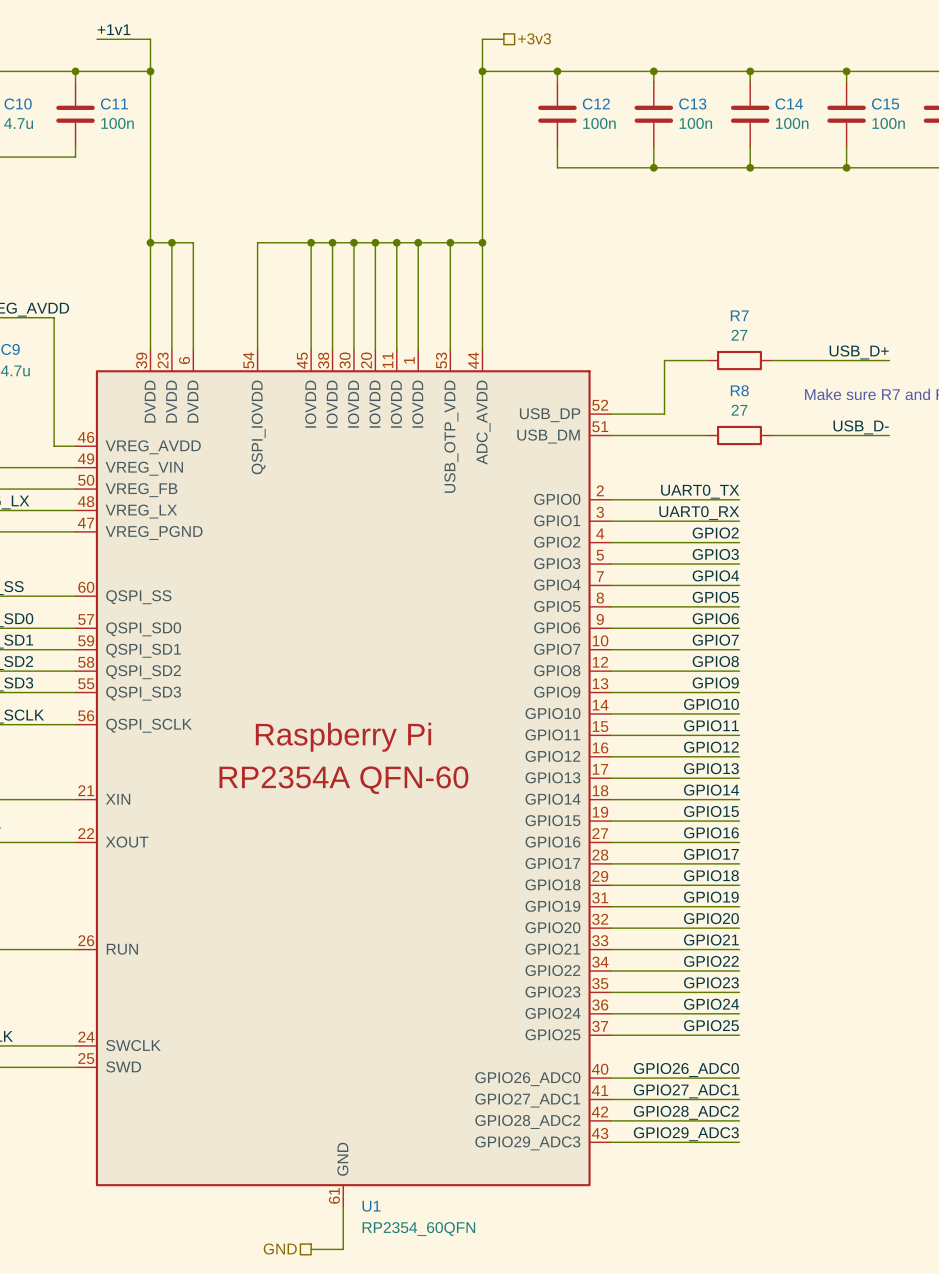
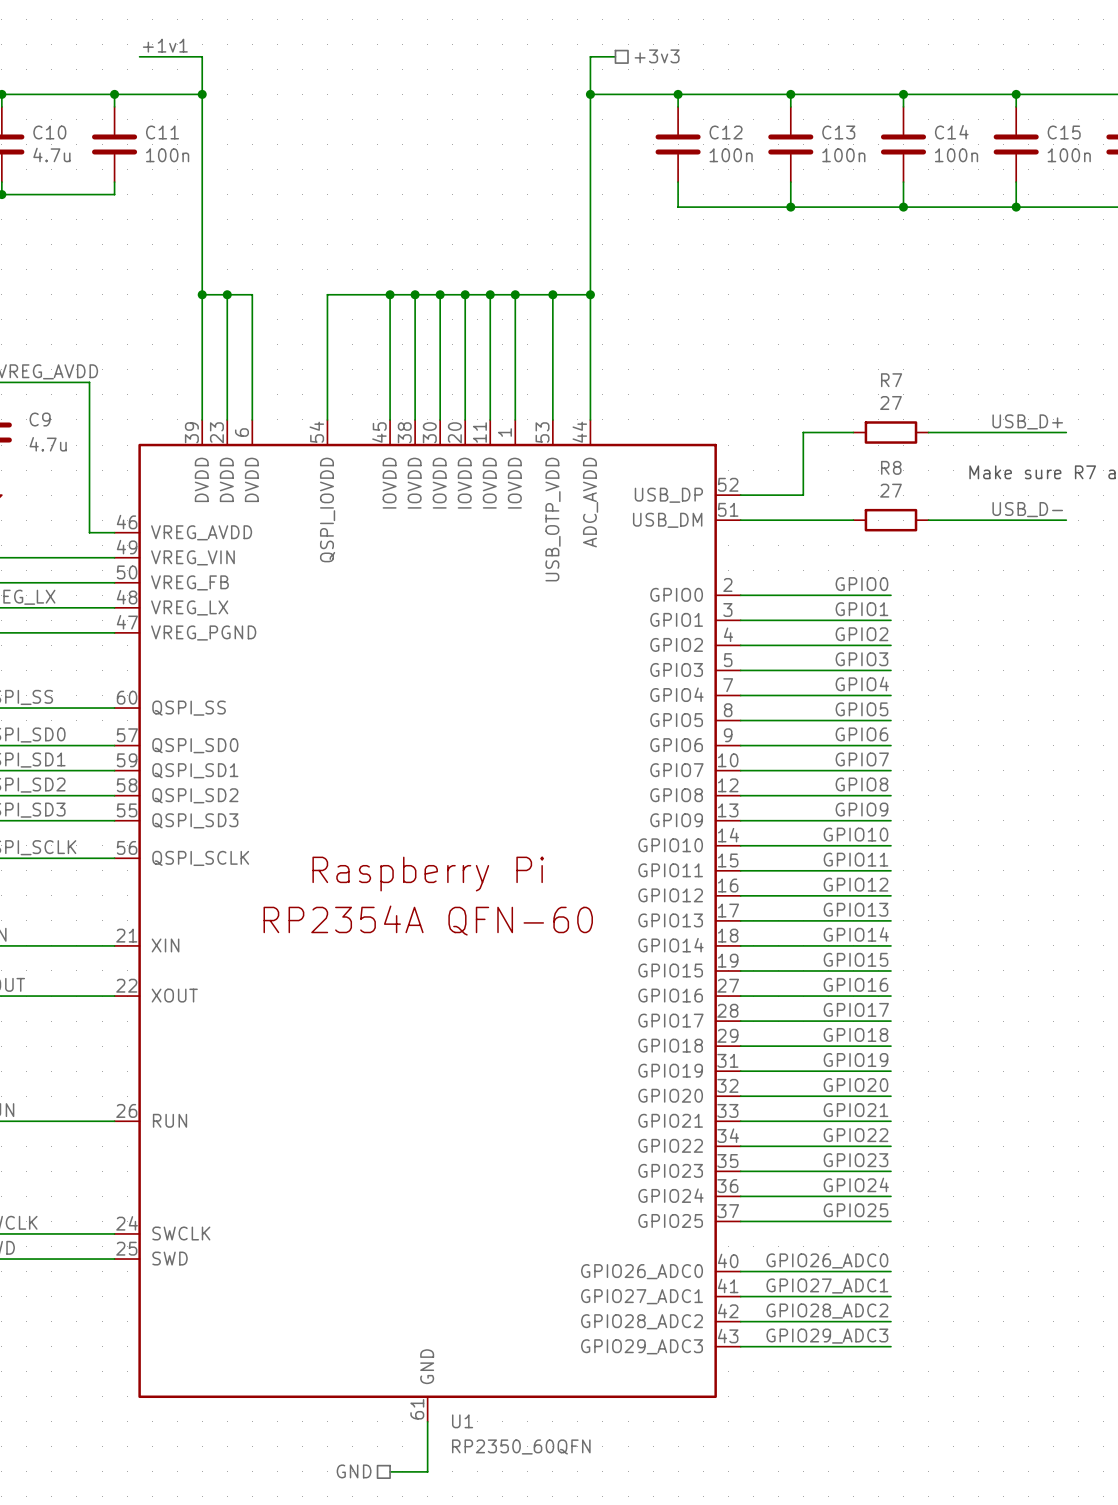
label: UART0_TX (700, 491) -> GPIO0 (861, 584)
label: UART0_RX (699, 513) -> GPIO1 (861, 609)
U1 value: RP2354_60QFN (418, 1229) -> RP2350_60QFN (521, 1446)

